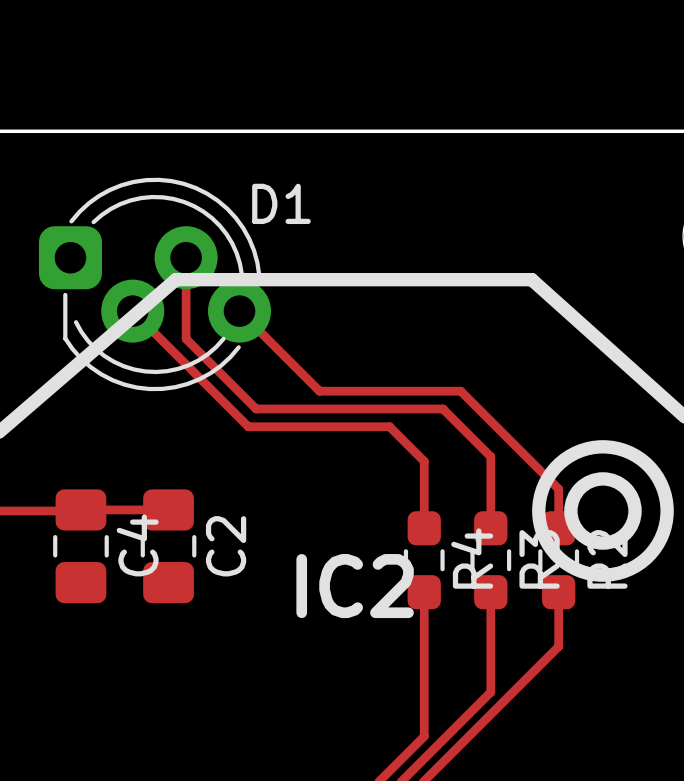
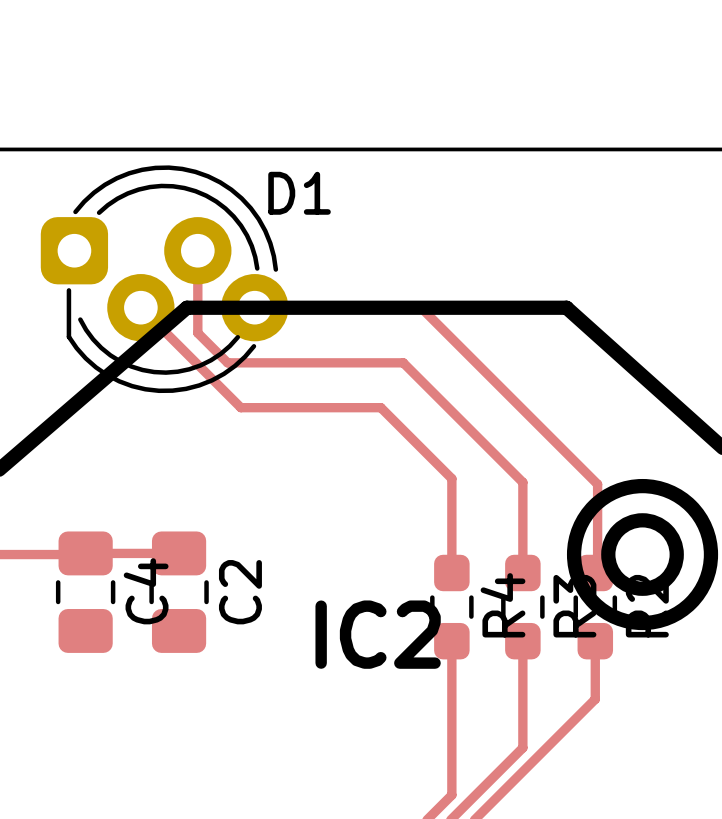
top track: none -> (254, 307) (421, 307) (597, 484) (597, 571)
D1 position: (154, 284) -> (164, 279)
top track: (186, 303) (186, 338) (256, 408) (443, 408) (490, 456) -> (197, 333) (227, 362) (403, 362) (522, 482) (522, 496)
top track: (132, 311) (248, 426) (389, 426) (424, 461) -> (140, 307) (240, 407) (380, 407) (451, 478) (451, 501)
top track: (239, 311) (319, 391) (460, 391) (558, 489) (558, 528) -> none

